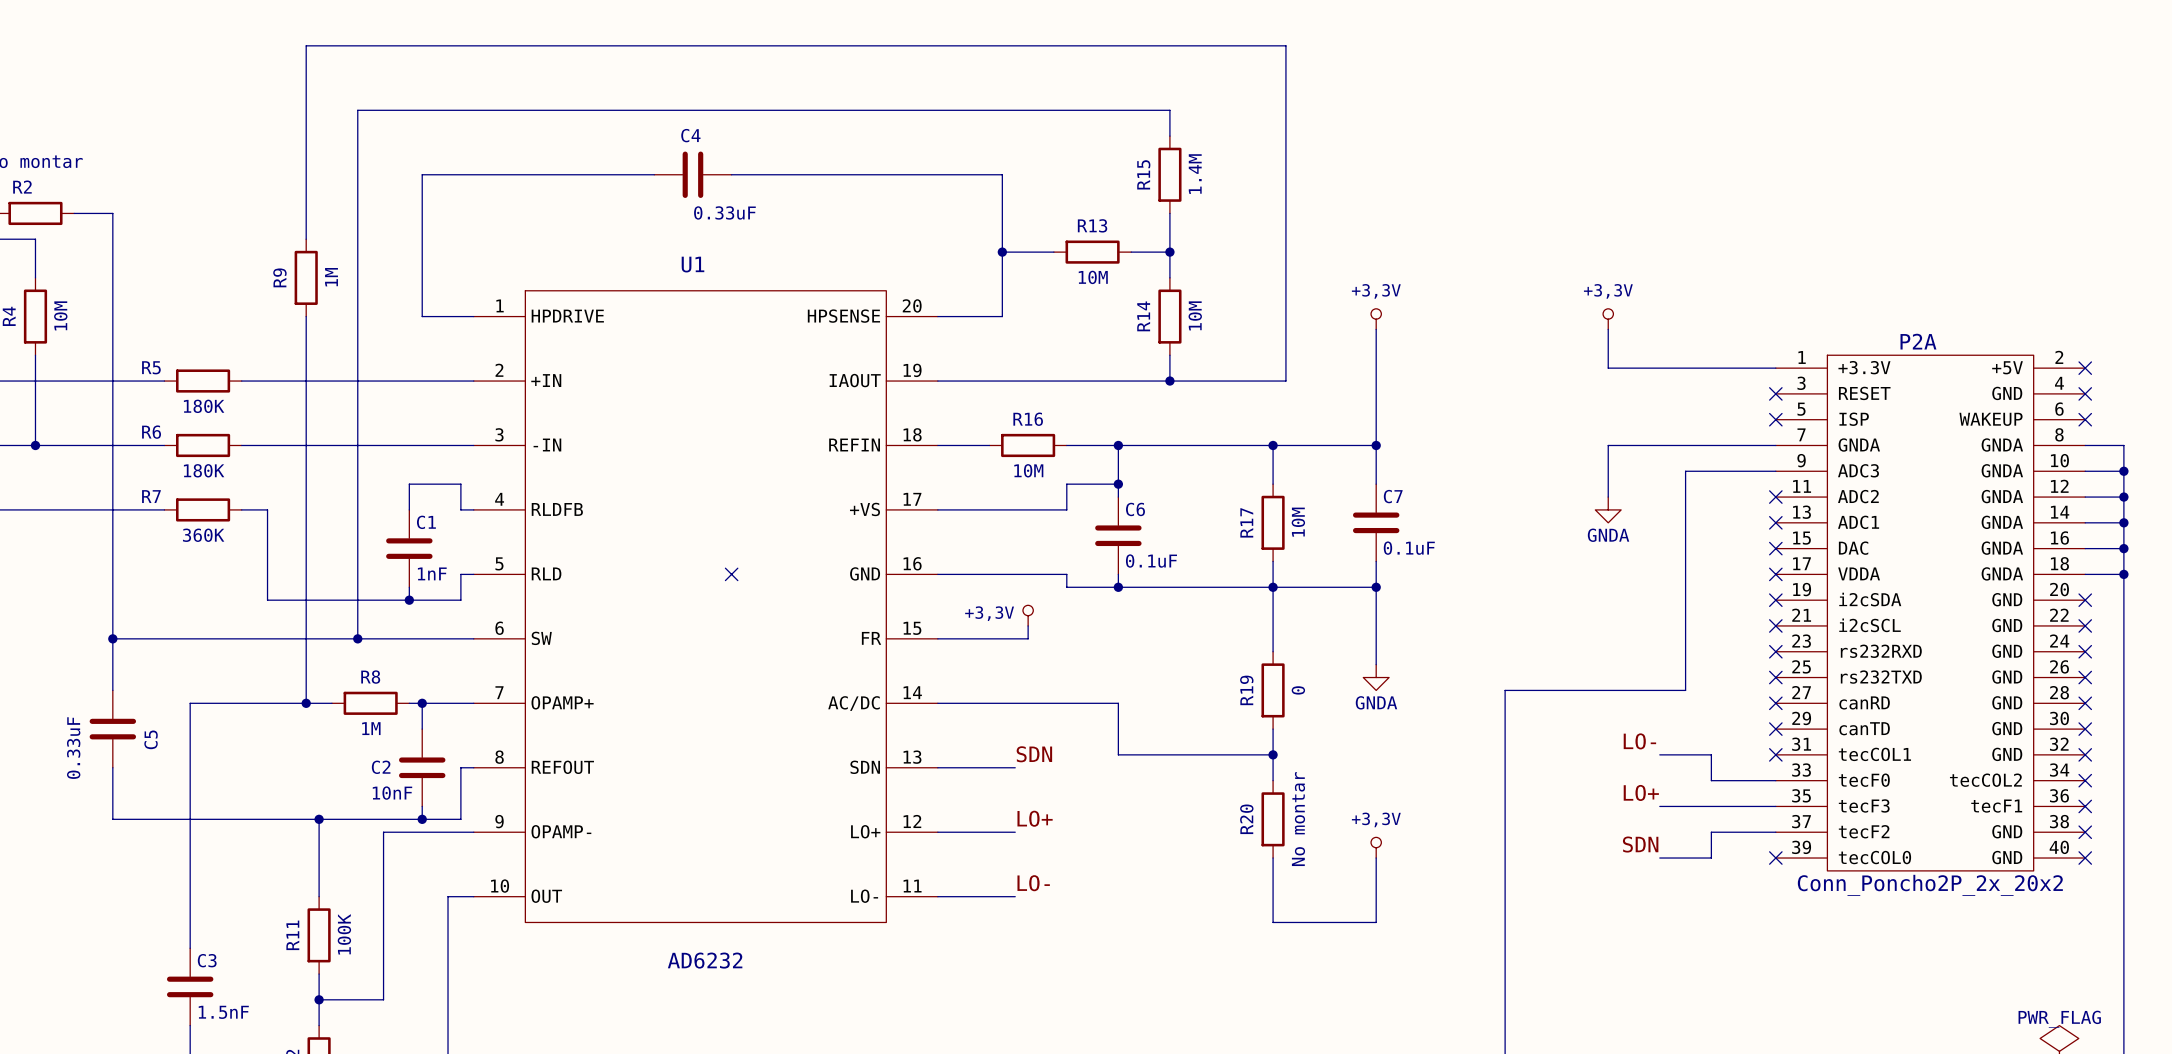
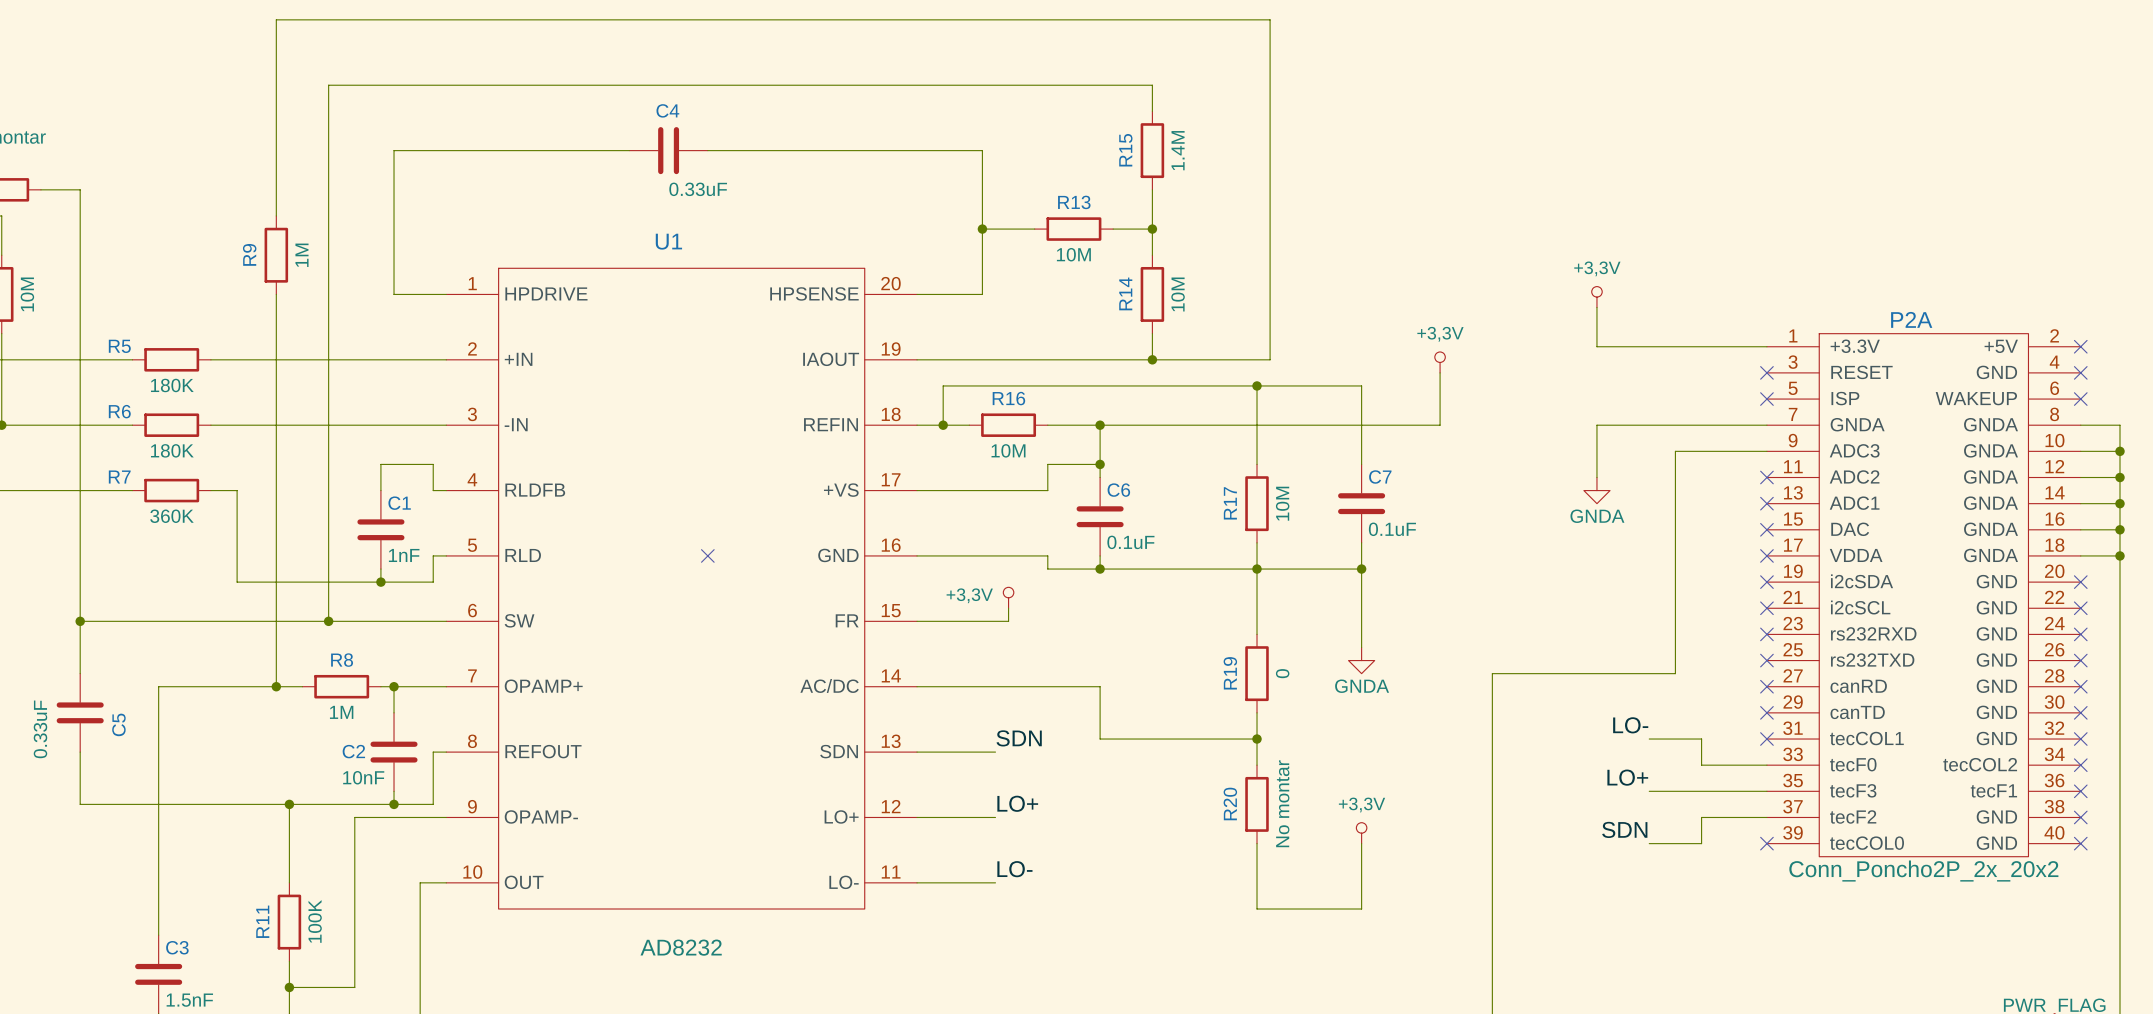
power symbol position: +3,3V (1376, 319) -> +3,3V (1440, 362)
wire: (1376, 329) (1376, 406) -> (943, 425) (943, 385) (1361, 385)
wire: none -> (1440, 372) (1440, 425) (1361, 425)
wire: none -> (1257, 385) (1257, 425)
junction: none -> (943, 425)
junction position: (1273, 445) -> (1257, 385)
junction: (1376, 445) -> none
U1 value: AD6232 (705, 960) -> AD8232 (681, 947)

